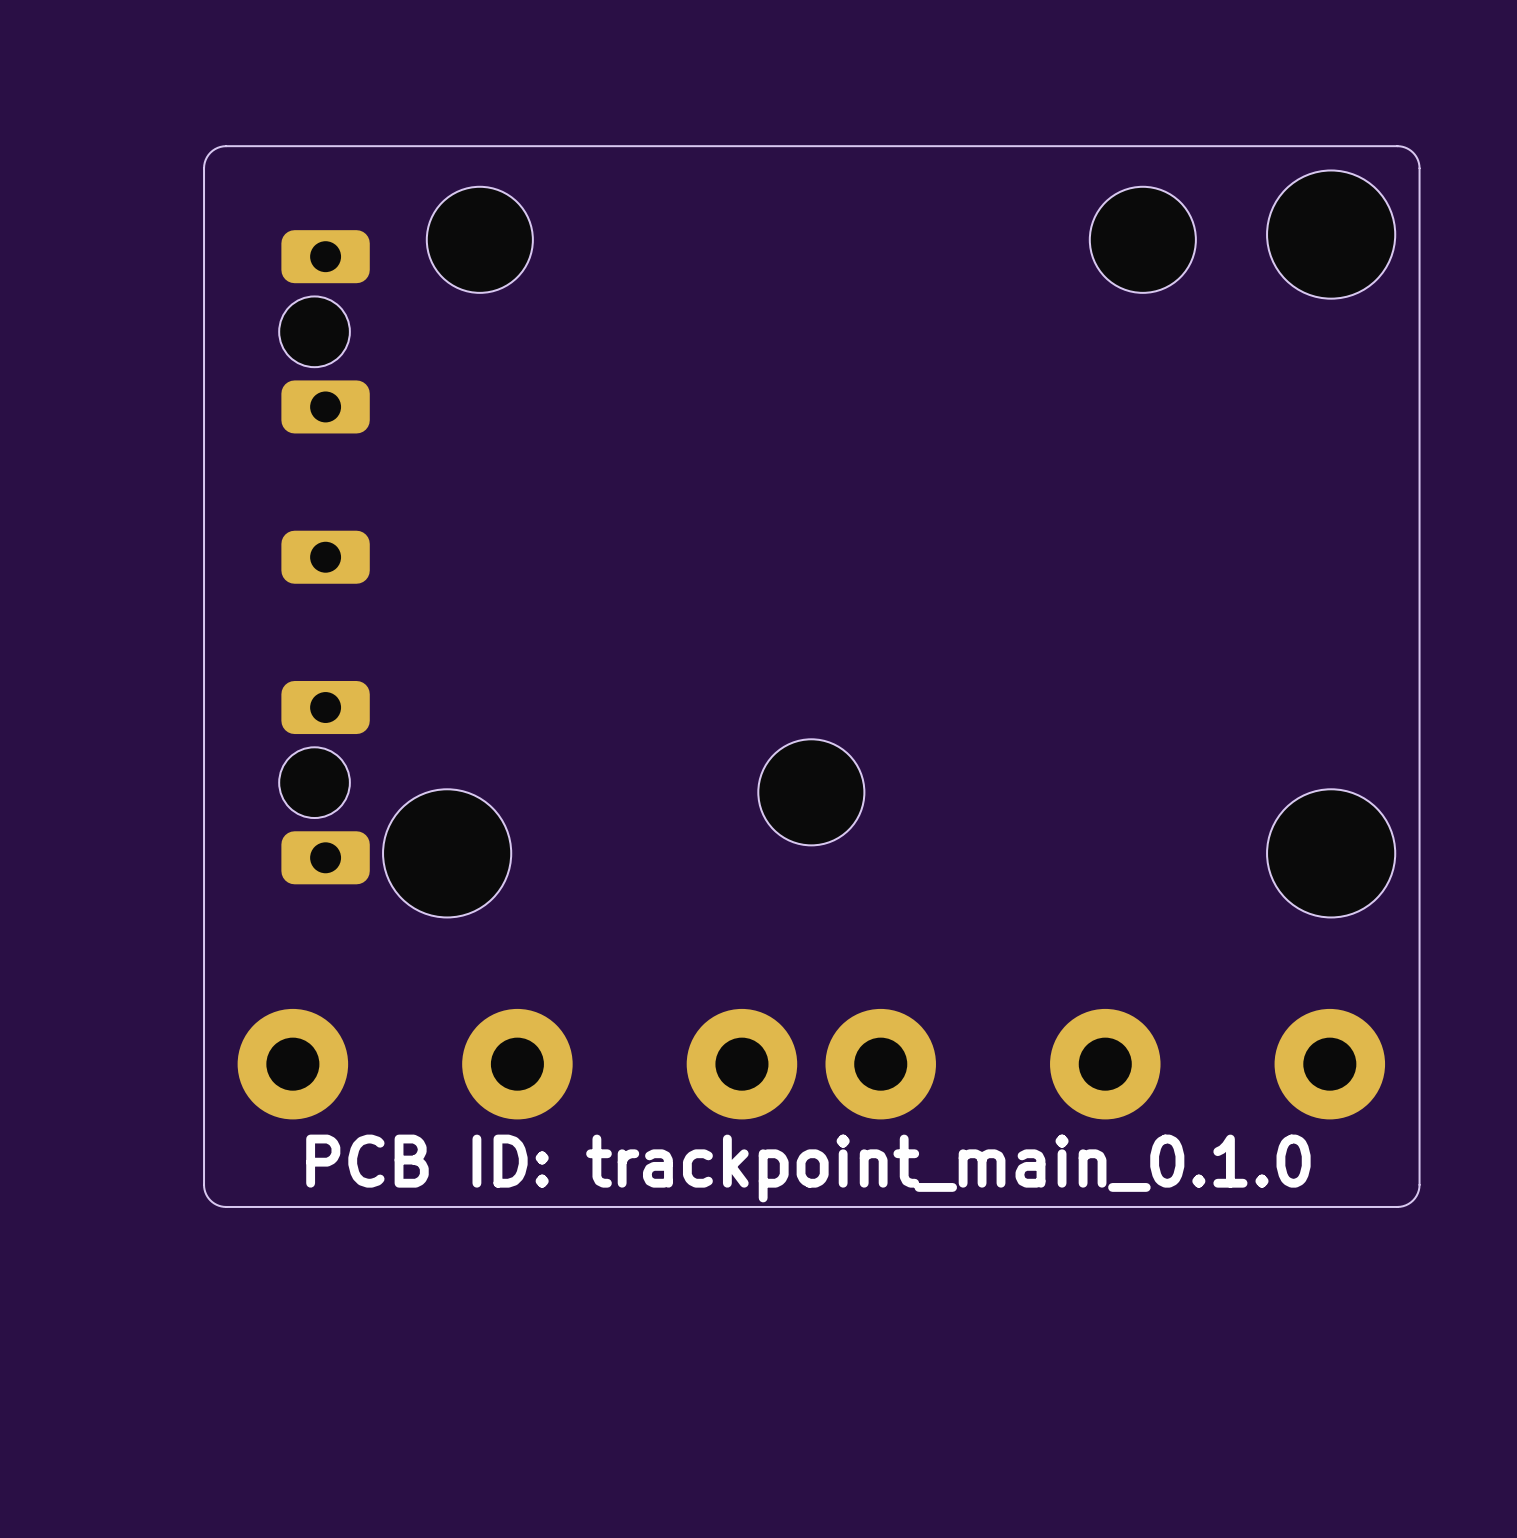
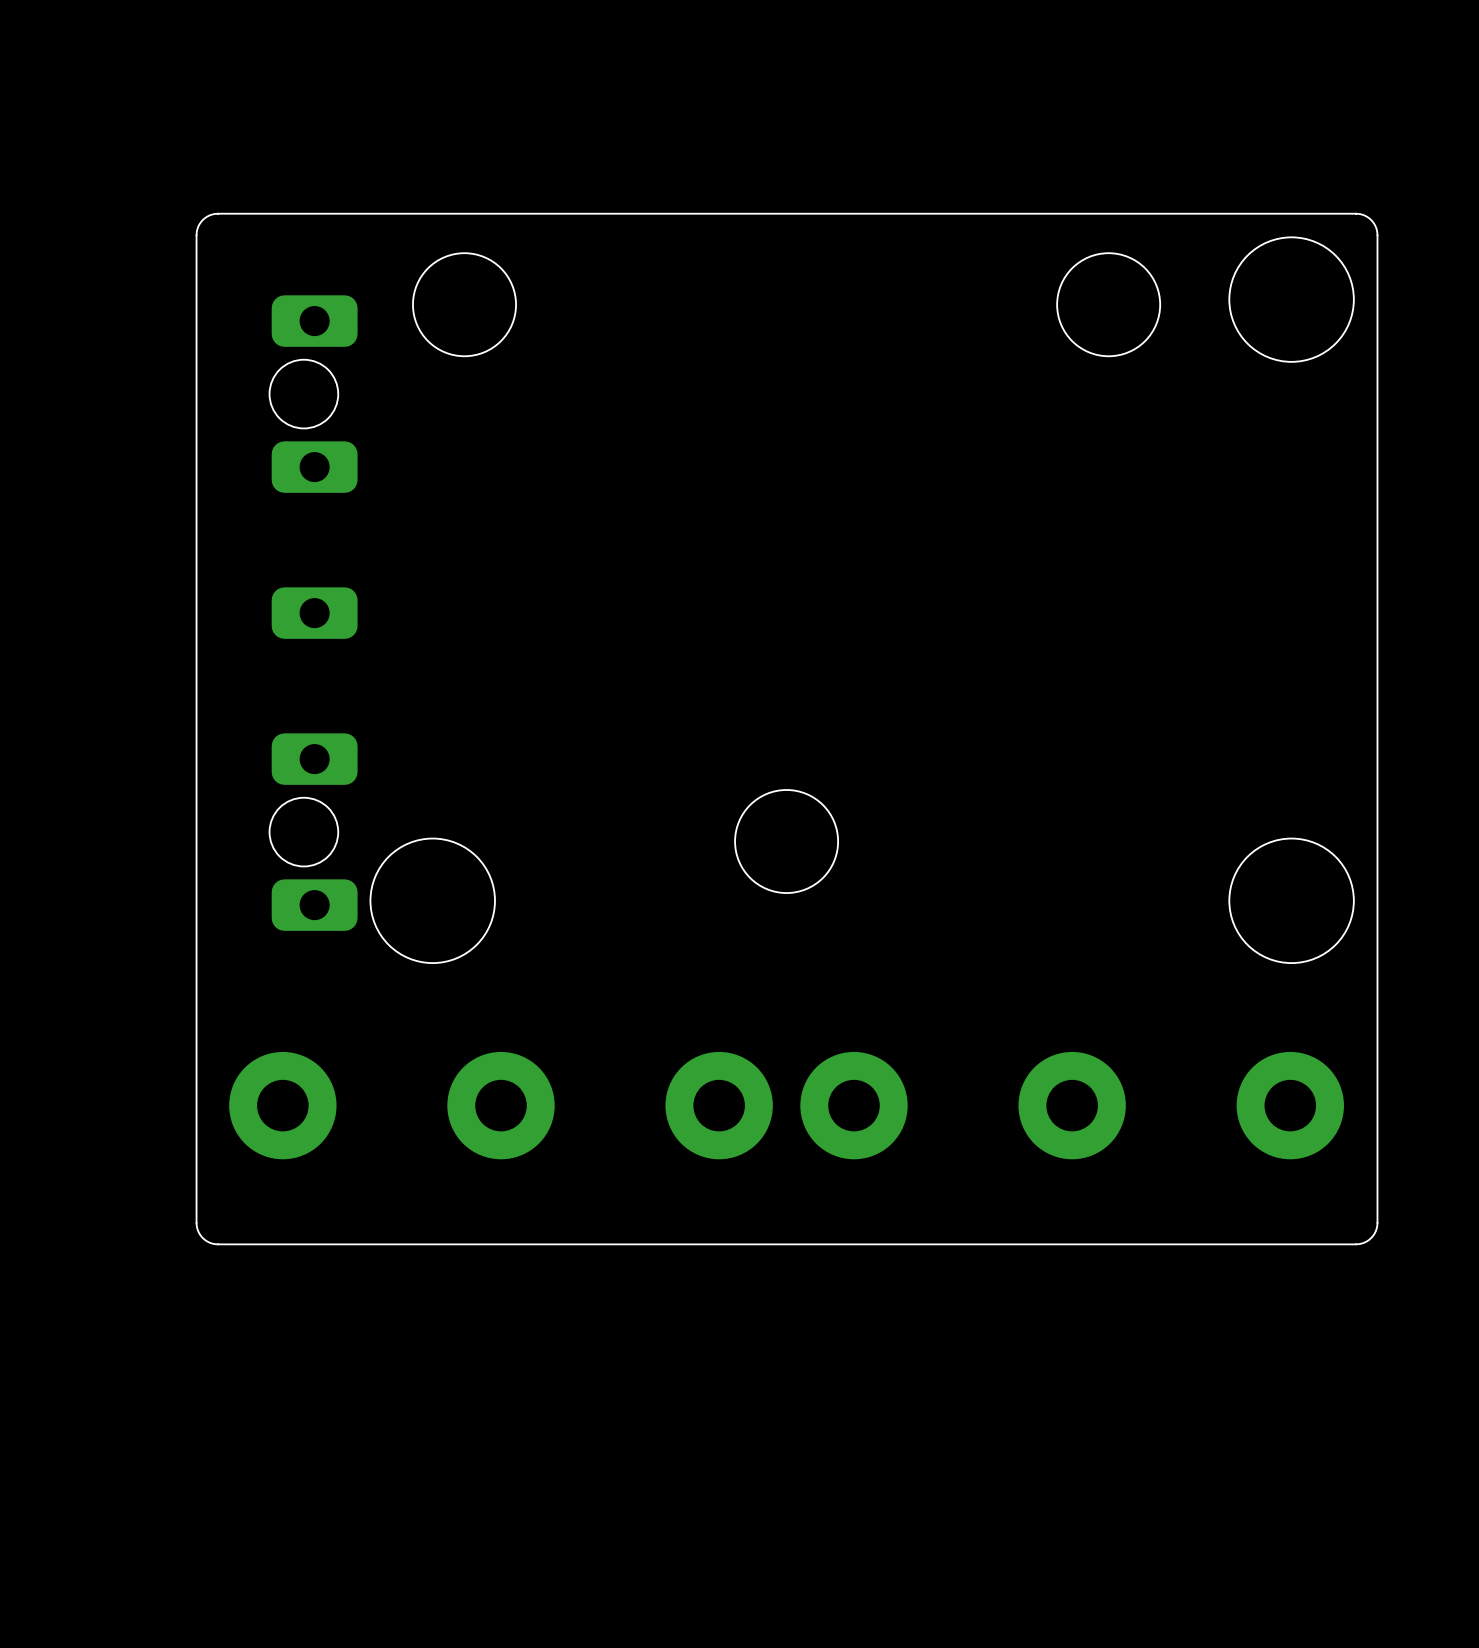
text: PCB ID: trackpoint_main_0.1.0 (808, 1168) -> none

